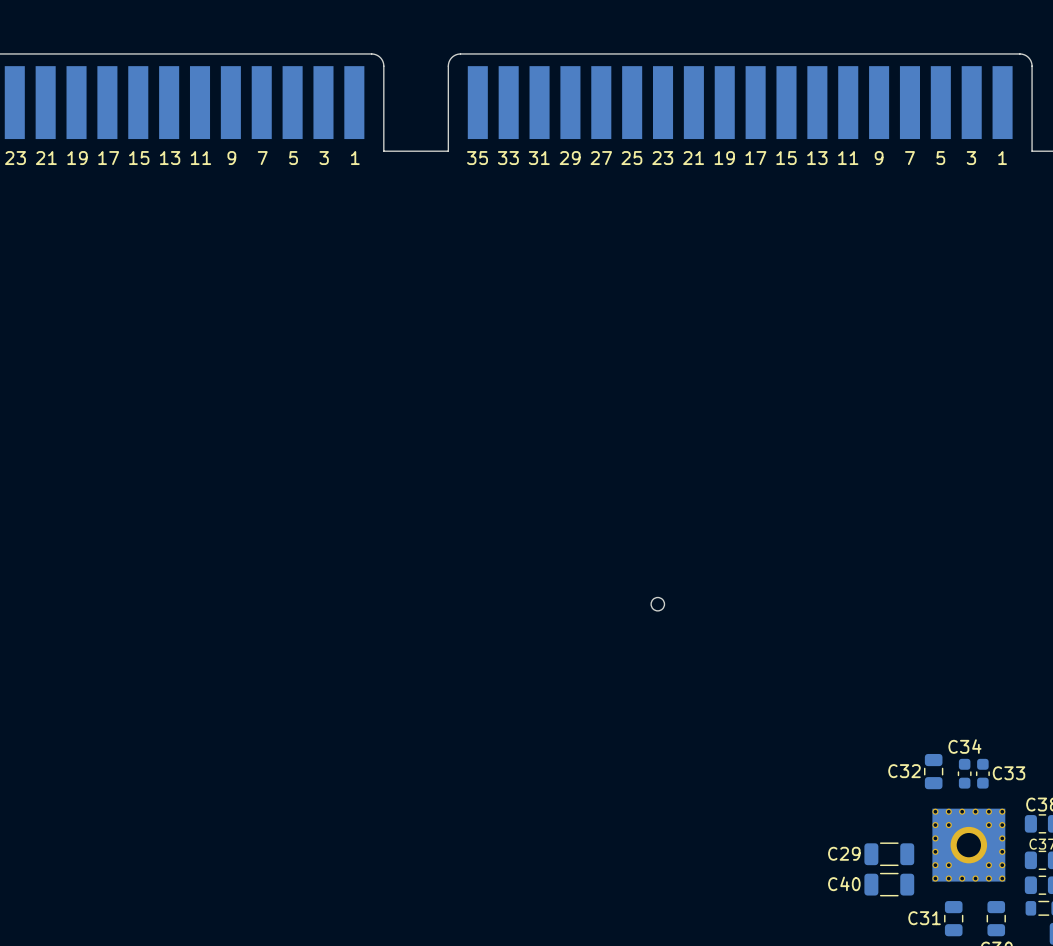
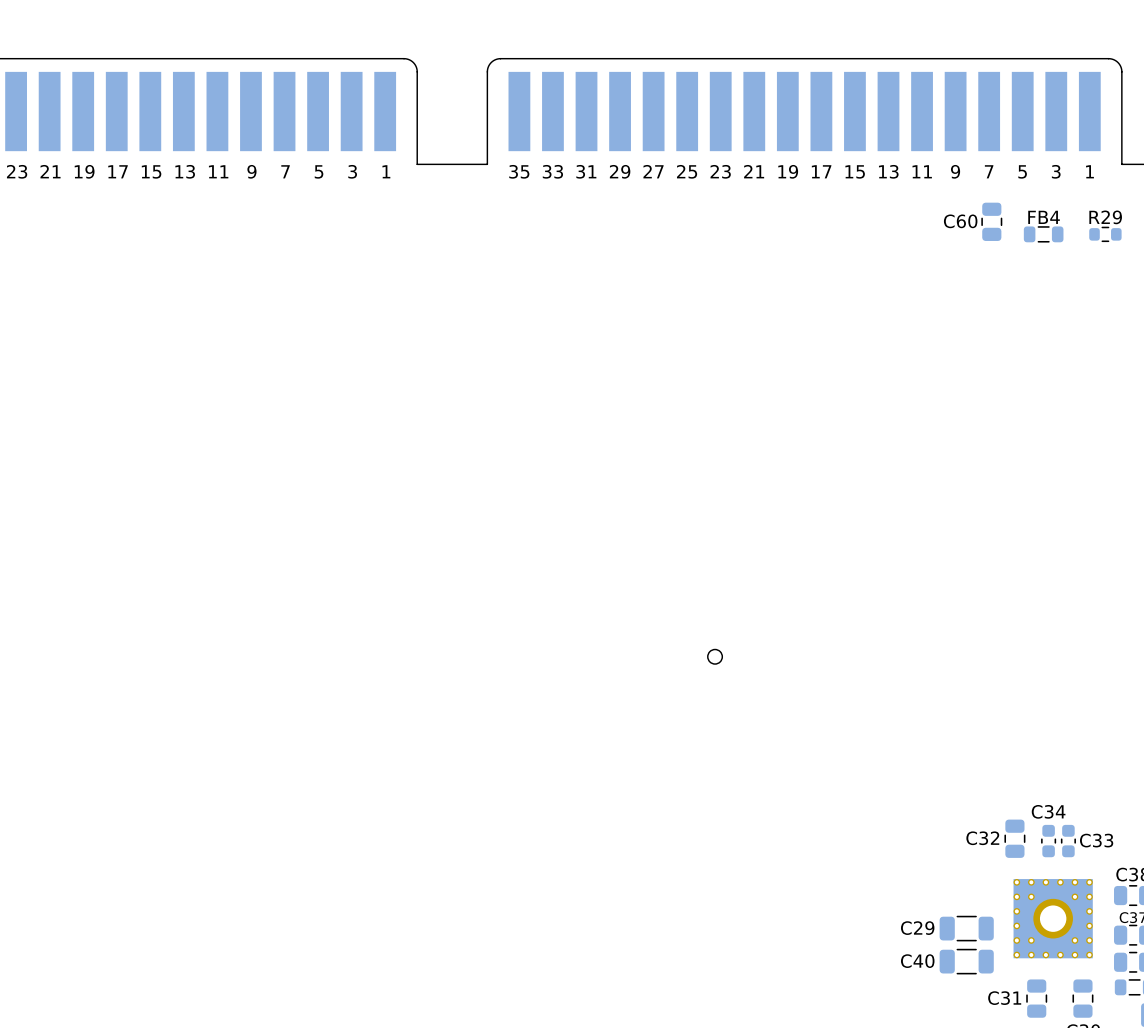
C60: none -> (991, 221)
FB4: none -> (1043, 234)
R29: none -> (1105, 234)

